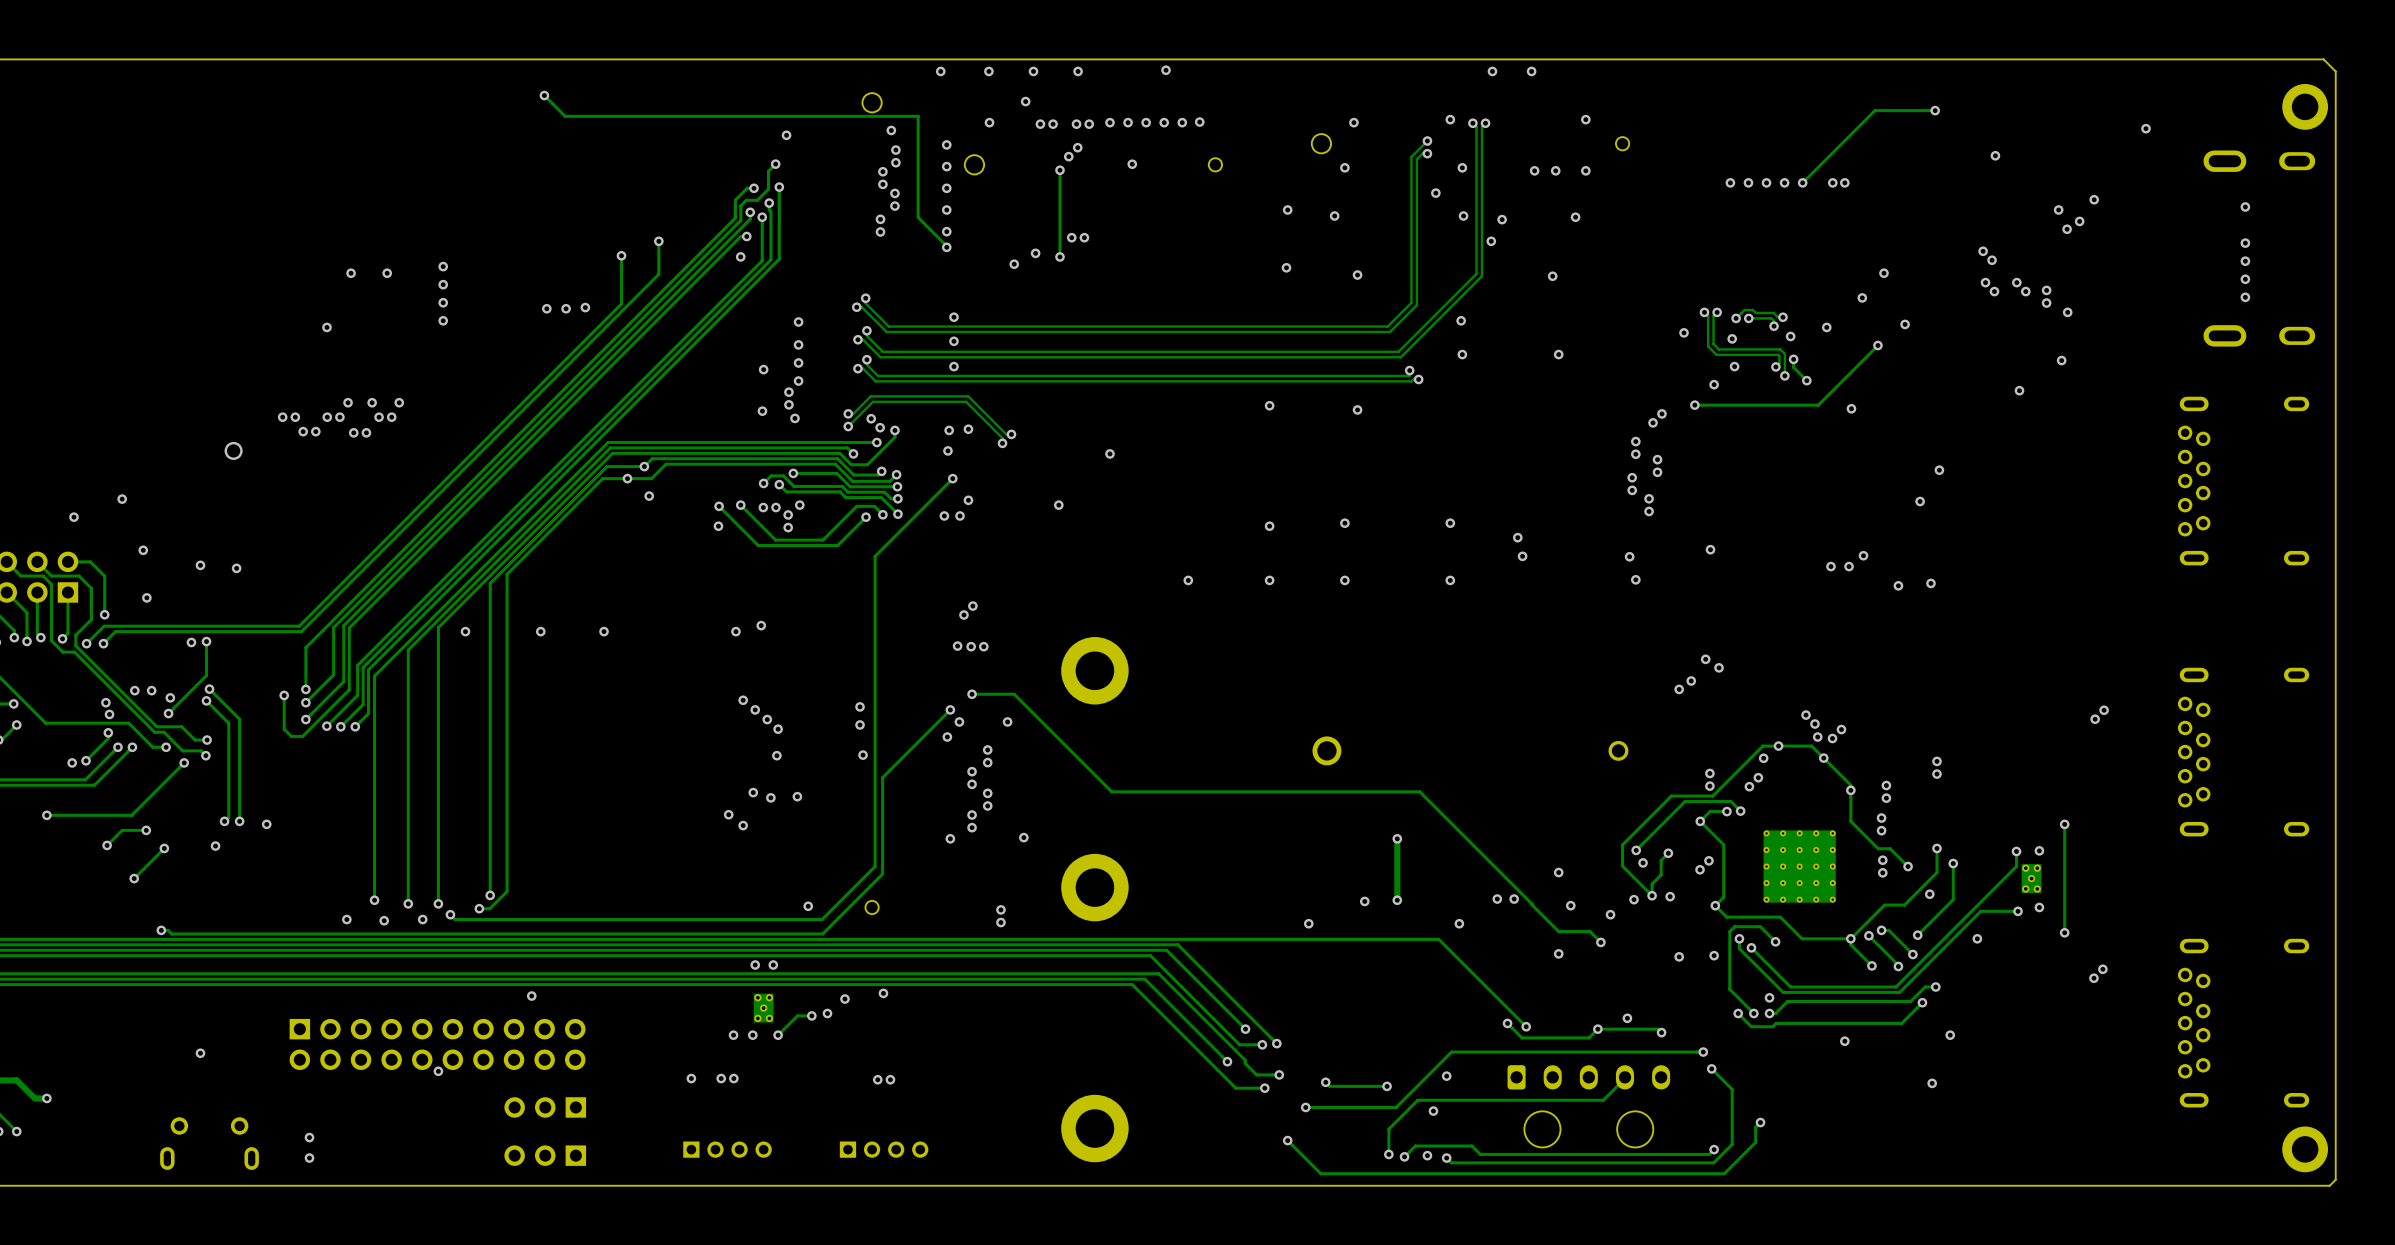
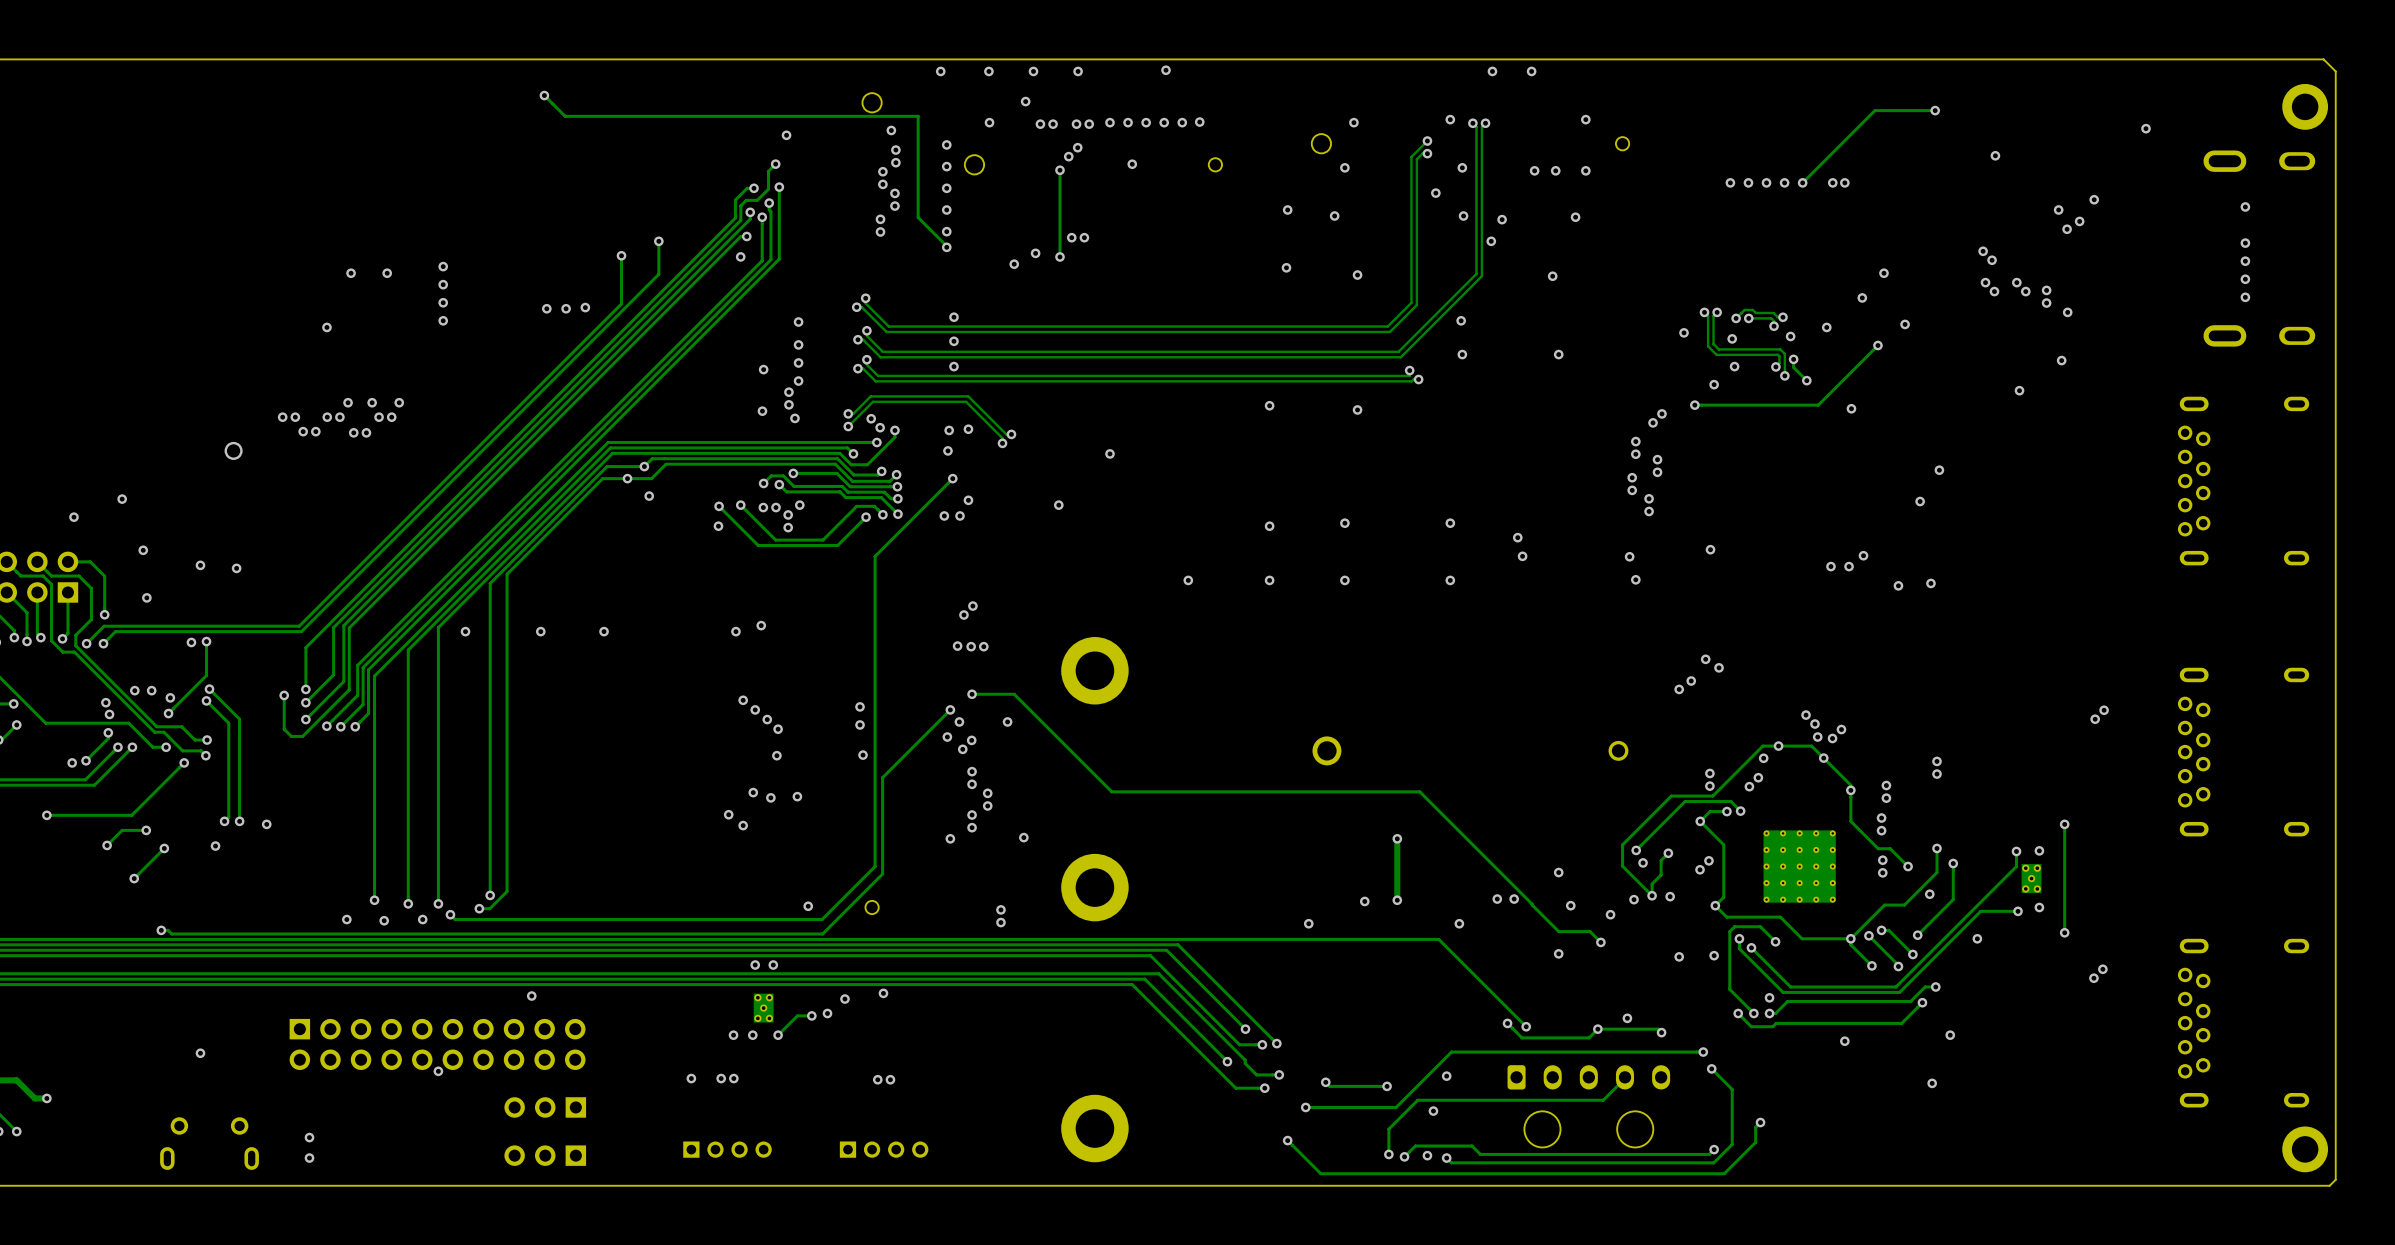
via: none -> (971, 740)
via: none -> (962, 749)
via: (987, 749) -> none
via: (987, 762) -> none

